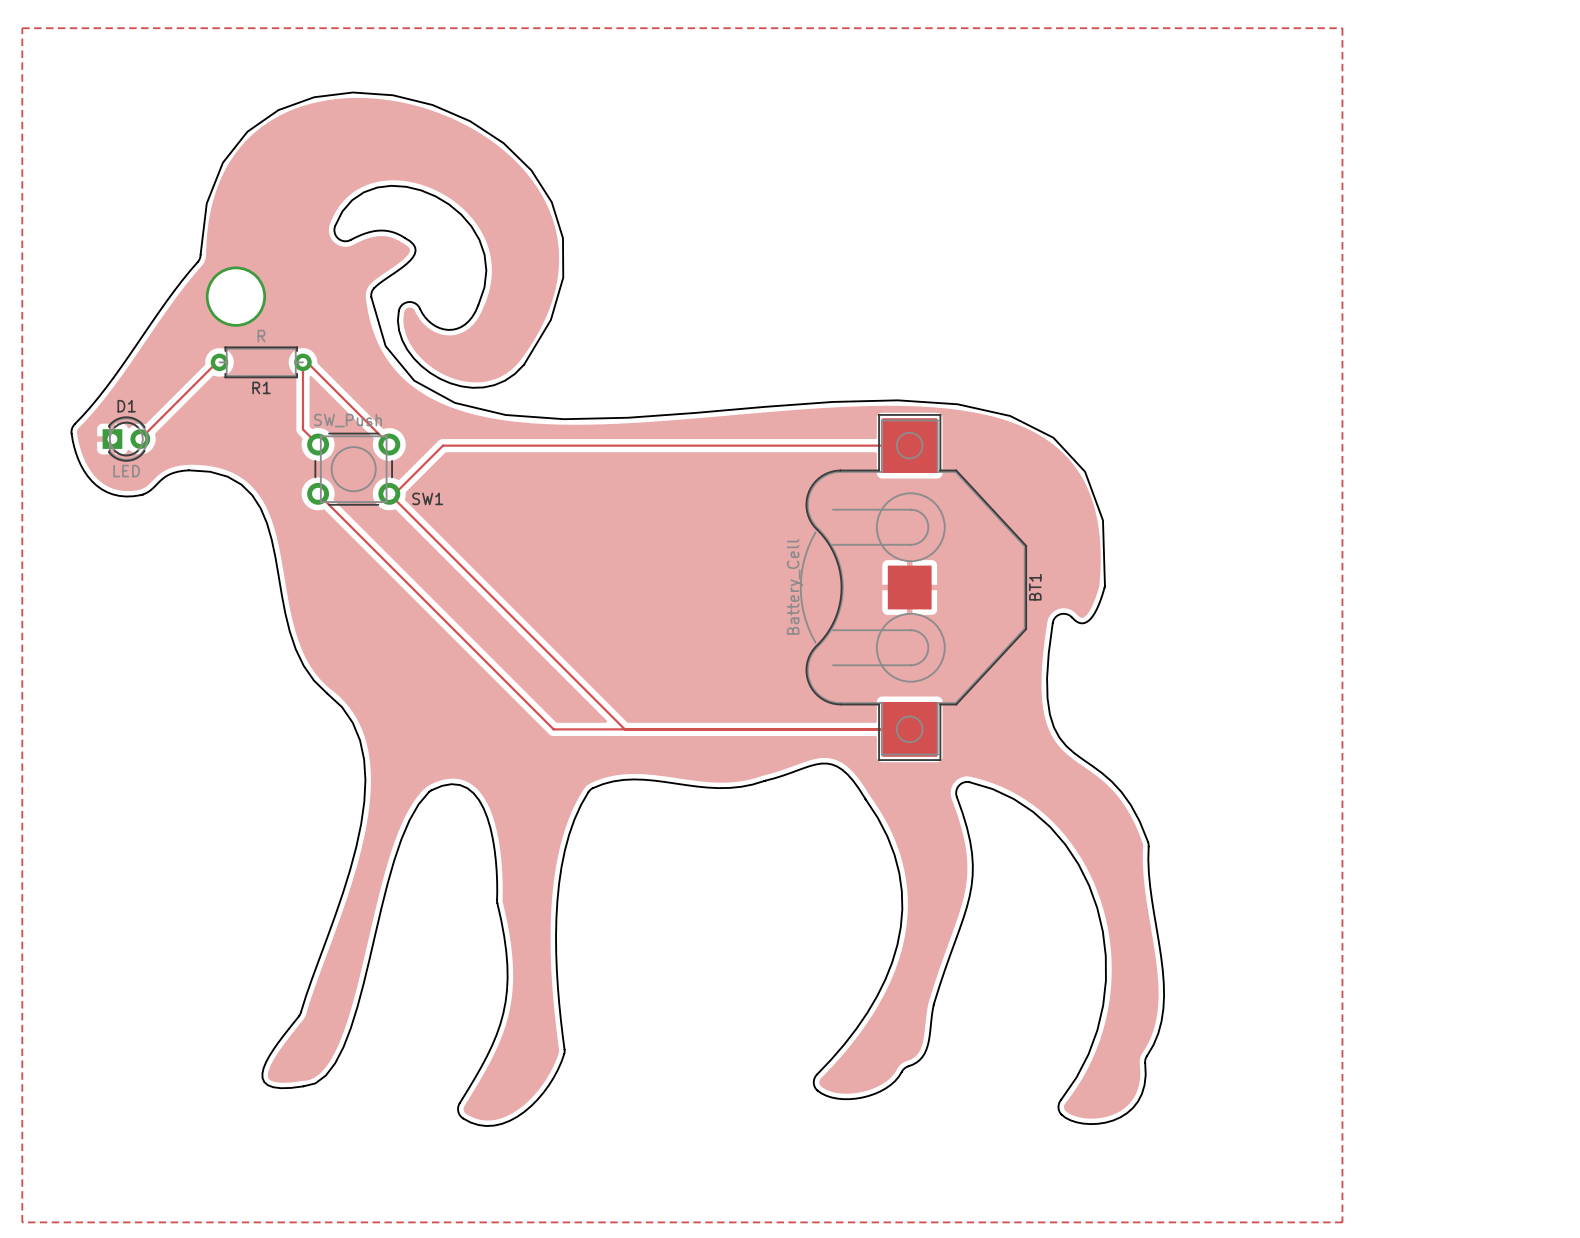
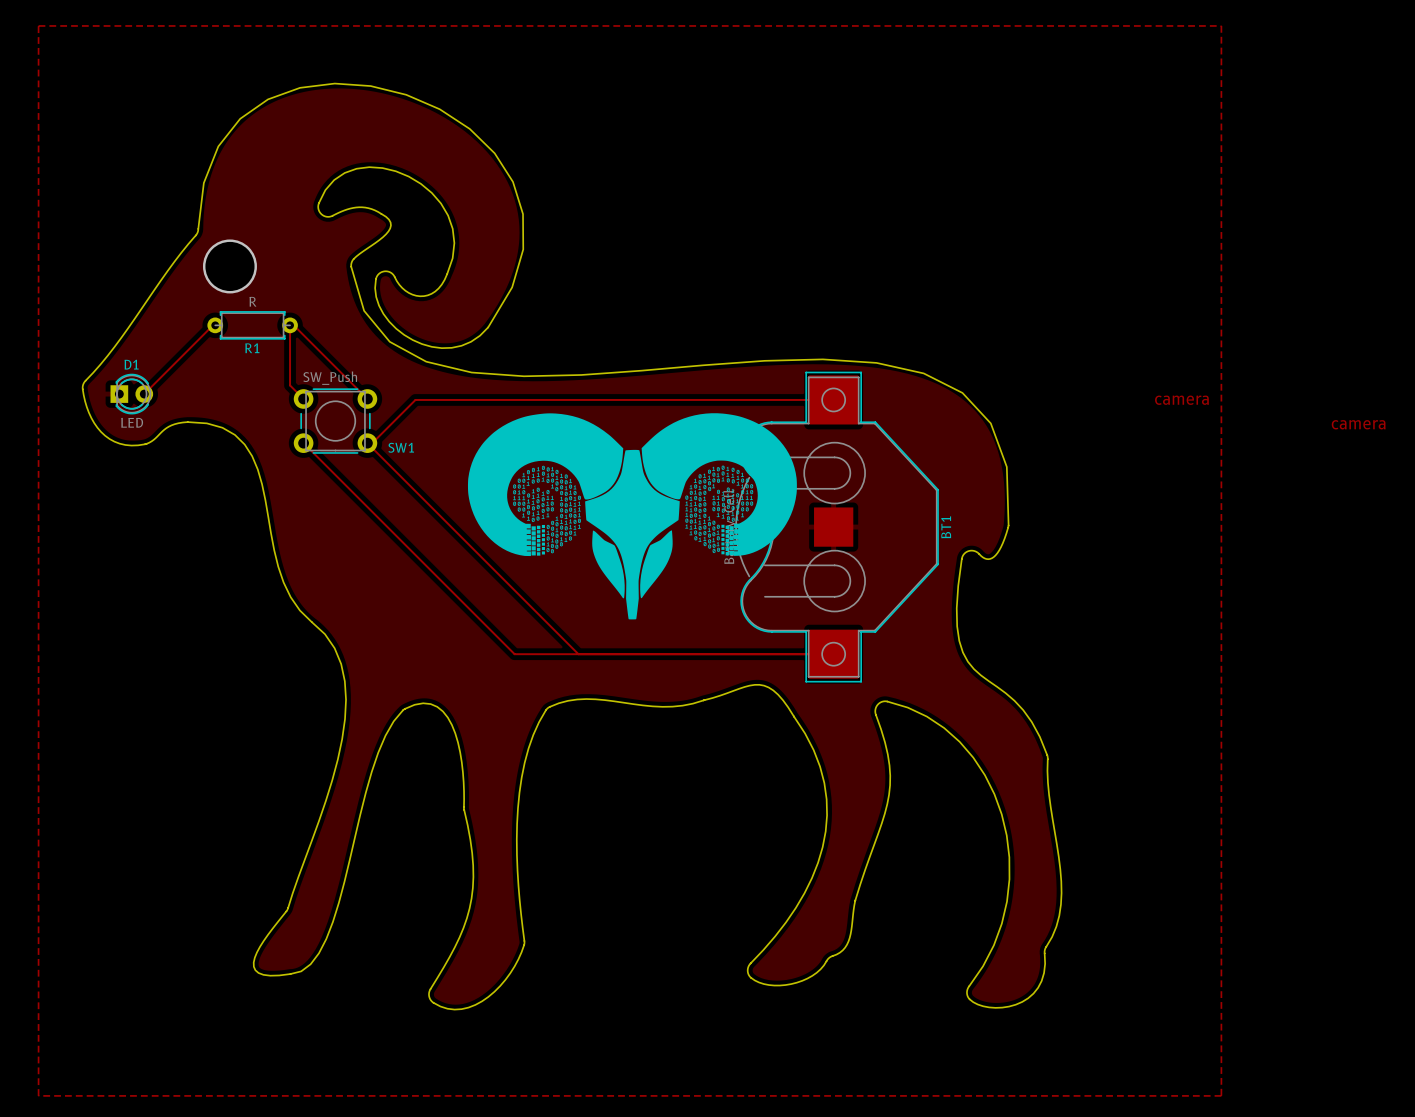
text: none -> camera (1182, 400)
text: none -> camera (1358, 424)
part: none -> (632, 516)

